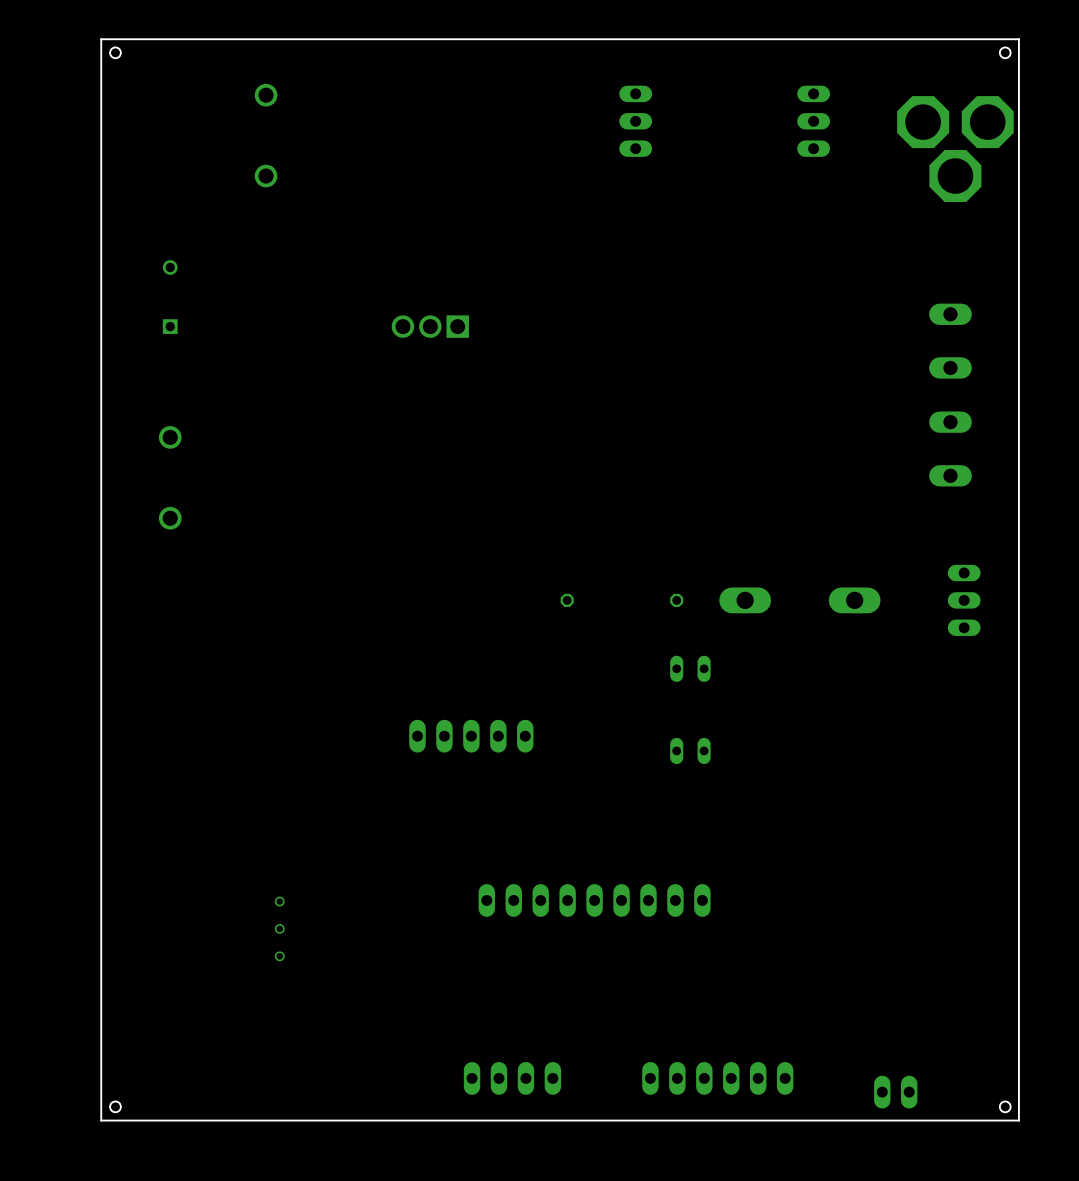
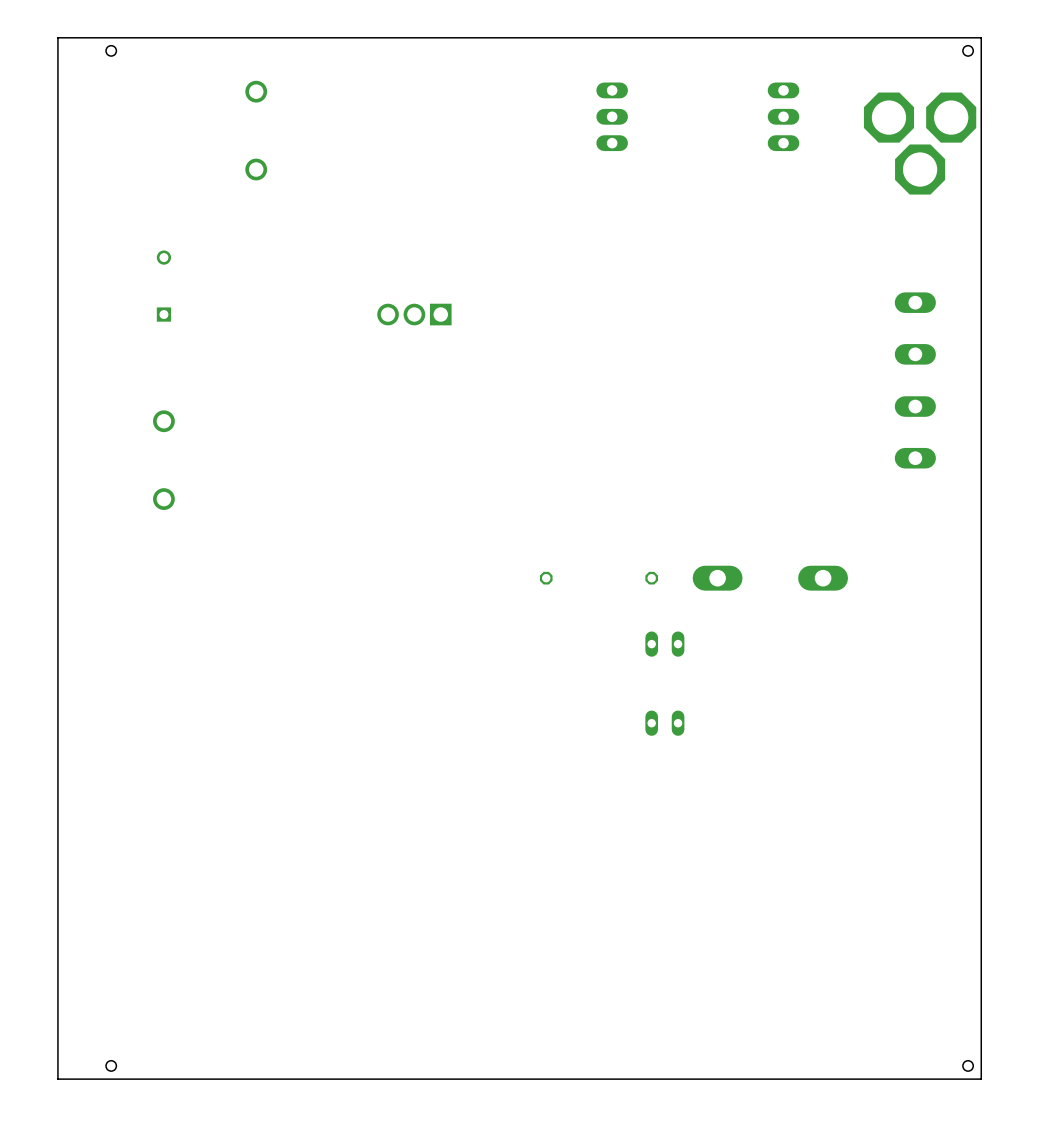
board edge: (101, 39) (101, 1120) -> (97, 37) (57, 37) (57, 1079) (97, 1079)
part: (964, 600) -> none
part: (471, 736) -> none
part: (594, 900) -> none
part: (279, 928) -> none
part: (512, 1078) -> none
part: (717, 1078) -> none
part: (895, 1092) -> none

